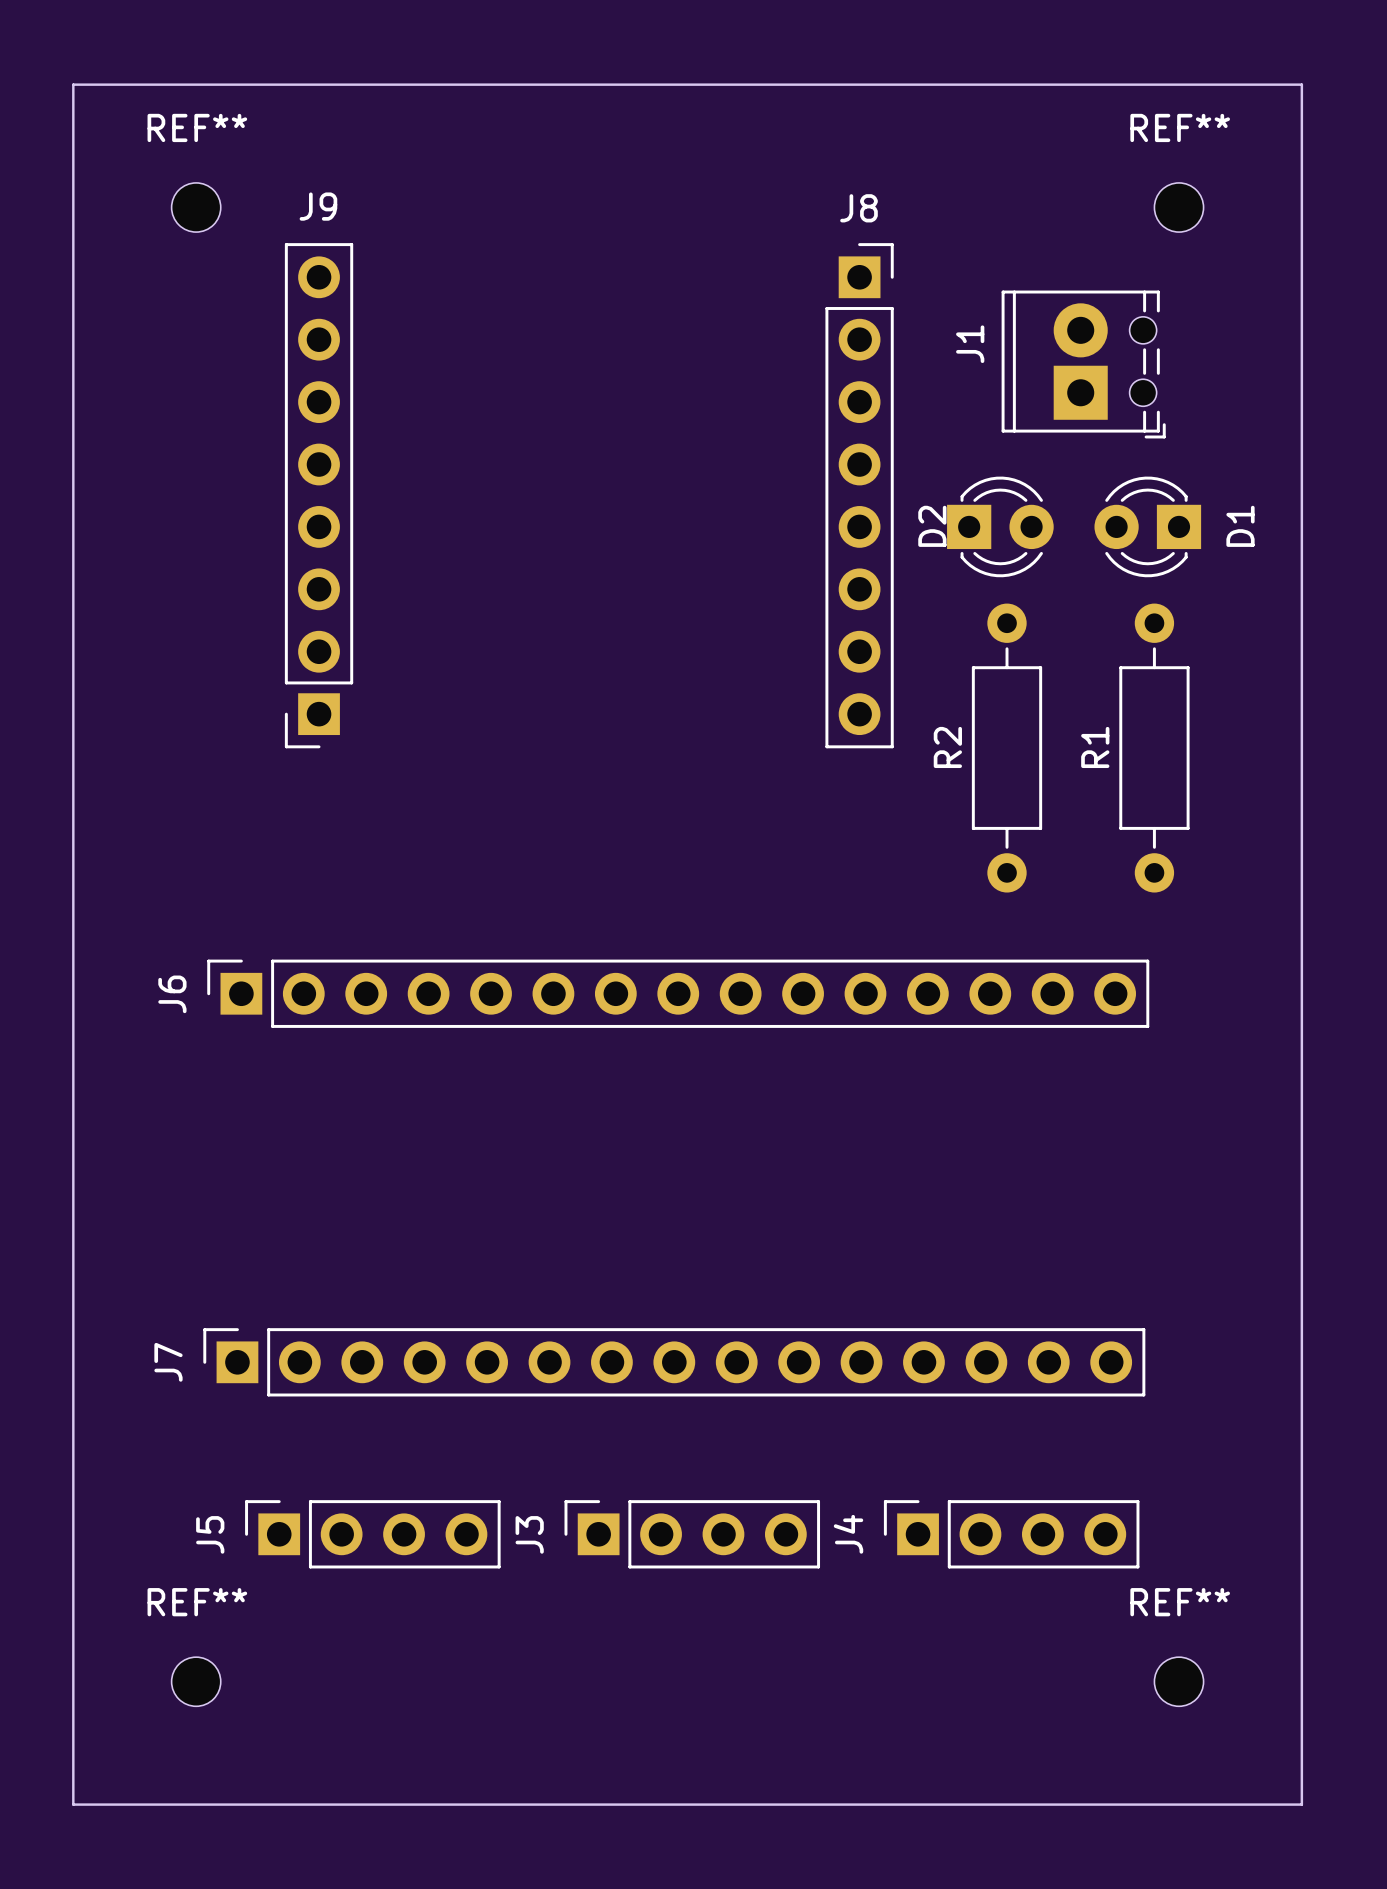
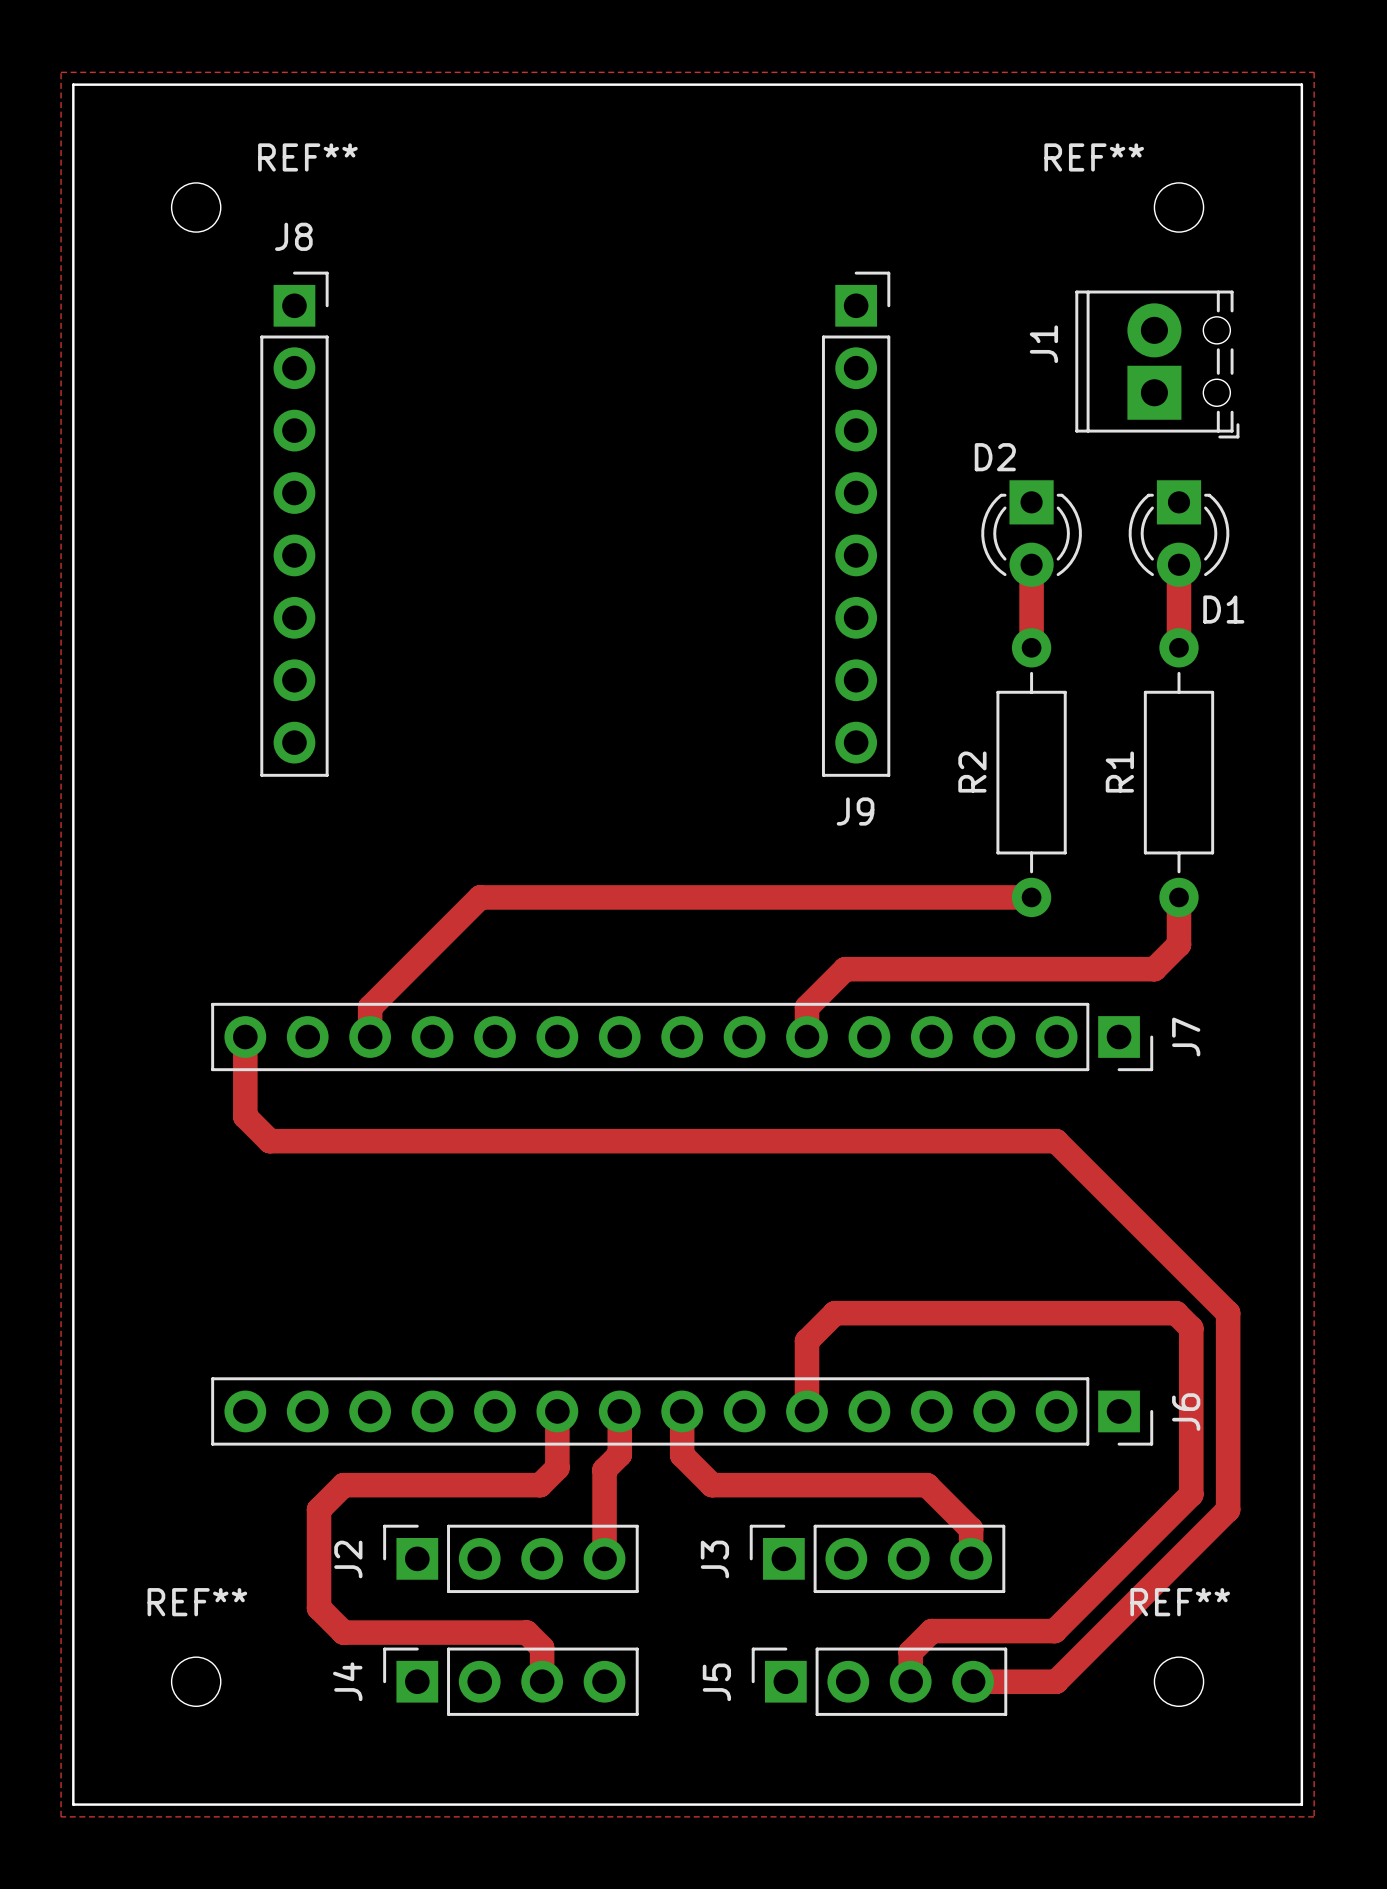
zone outline: none -> (61, 72) (1314, 72) (1314, 1816) (61, 1816) (61, 72)
REF** name position: REF** (197, 127) -> REF** (307, 157)
REF** name position: REF** (1180, 127) -> REF** (1094, 157)
J1 position: (1083, 364) -> (1157, 364)
J9 rotation: 0° (319, 495) -> 180° (856, 524)
J9 position: (319, 495) -> (856, 524)
J8 position: (859, 495) -> (294, 524)
D2 rotation: 0° (1000, 526) -> 90° clockwise (1031, 533)
D1 rotation: 0° (1147, 526) -> 90° counterclockwise (1179, 533)
D1 name position: D1 (1240, 526) -> D1 (1223, 609)
track: none -> (1031, 564) (1031, 647)
track: none -> (1179, 564) (1179, 647)
R2 position: (1007, 748) -> (1031, 772)
R1 position: (1154, 748) -> (1179, 772)
track: none -> (1031, 897) (480, 897) (370, 1007) (370, 1037)
track: none -> (1179, 897) (1179, 944) (1154, 969) (845, 969) (807, 1007) (807, 1037)
J6 rotation: 0° (678, 993) -> 180° (682, 1411)
track: none -> (245, 1037) (245, 1116) (269, 1141) (1056, 1141) (1228, 1313) (1228, 1509) (1056, 1681) (973, 1681)
J7 rotation: 0° (674, 1362) -> 180° (682, 1037)
track: none -> (557, 1411) (557, 1467) (540, 1485) (343, 1485) (319, 1509) (319, 1608) (343, 1632) (526, 1632) (542, 1647) (542, 1681)
track: none -> (619, 1411) (619, 1454) (604, 1469) (604, 1558)
track: none -> (682, 1411) (682, 1455) (712, 1485) (926, 1485) (971, 1529) (971, 1558)
track: none -> (807, 1411) (807, 1341) (835, 1313) (1176, 1313) (1191, 1328) (1191, 1494) (1054, 1631) (931, 1631) (910, 1652) (910, 1681)
J5 position: (372, 1534) -> (879, 1681)
J3 position: (692, 1534) -> (877, 1558)
J4 position: (1011, 1534) -> (510, 1681)
J2: none -> (510, 1558)

